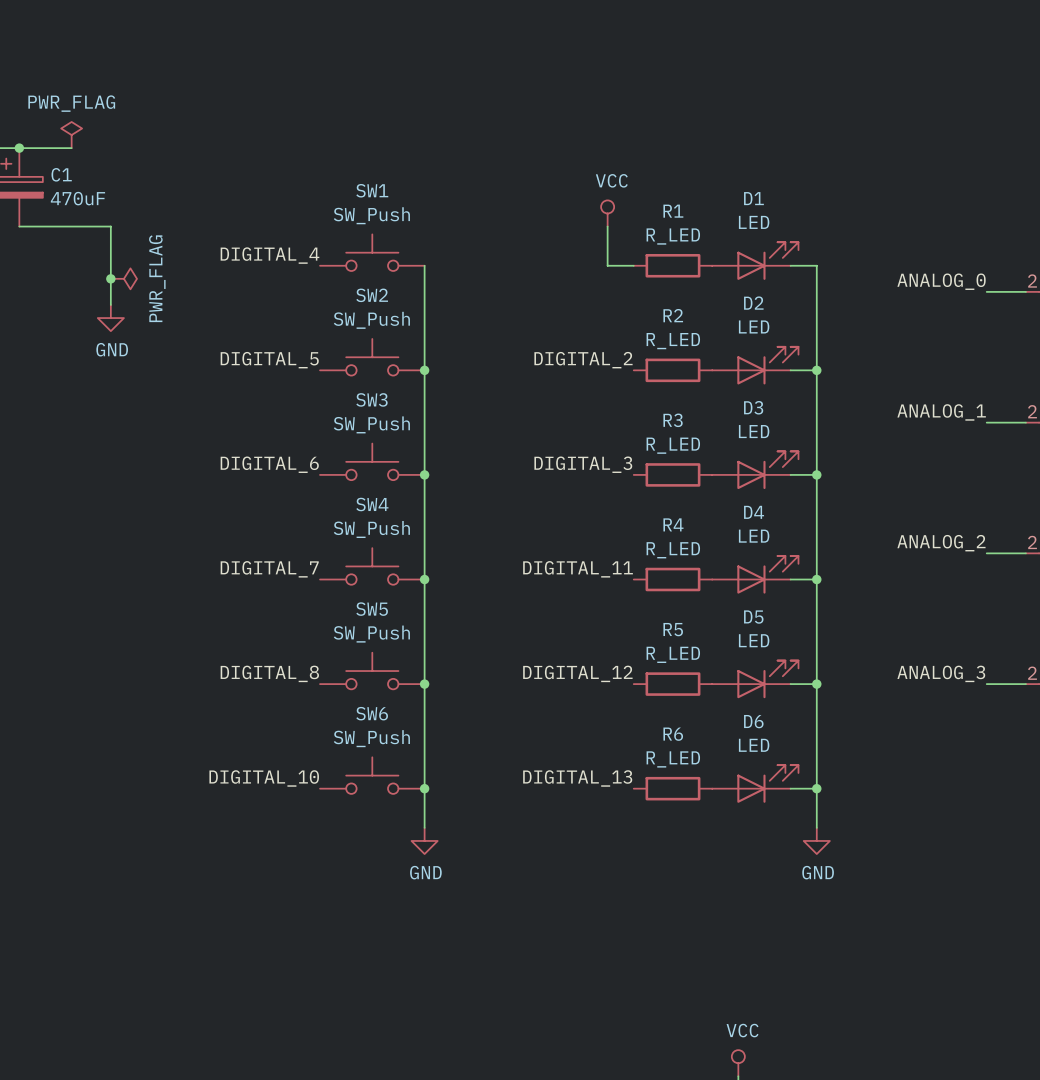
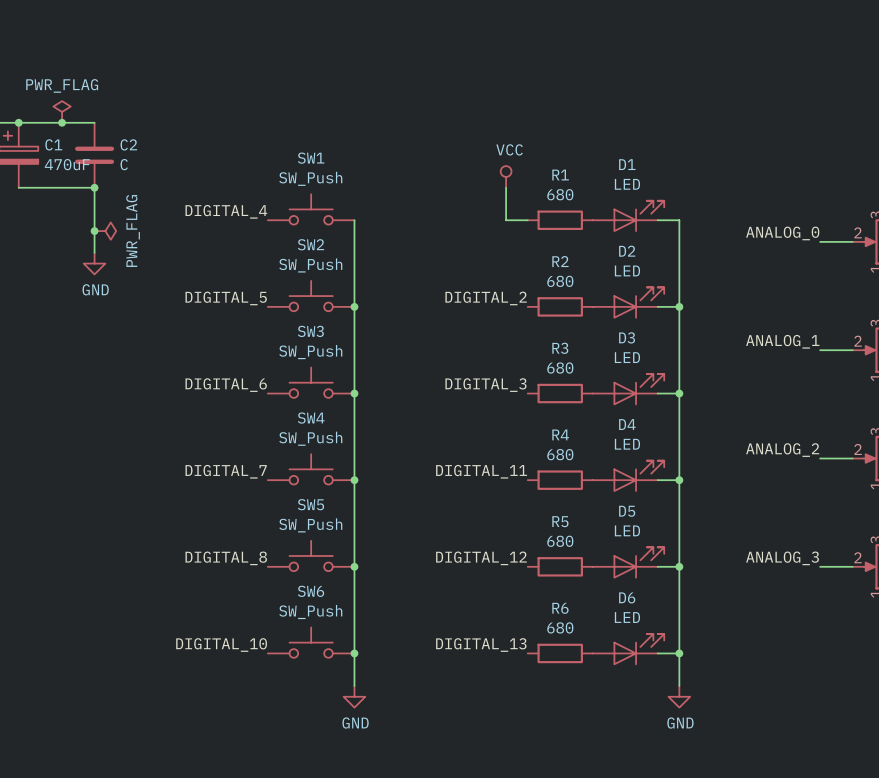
wire: none -> (62, 122) (94, 122)
junction: none -> (62, 122)
C2: none -> C (94, 155)
junction: none -> (94, 187)
R1 value: R_LED (673, 236) -> 680 (560, 194)
R2 value: R_LED (673, 341) -> 680 (560, 281)
R3 value: R_LED (673, 445) -> 680 (560, 368)
R4 value: R_LED (673, 550) -> 680 (560, 454)
R5 value: R_LED (673, 654) -> 680 (560, 541)
R6 value: R_LED (673, 759) -> 680 (560, 627)

